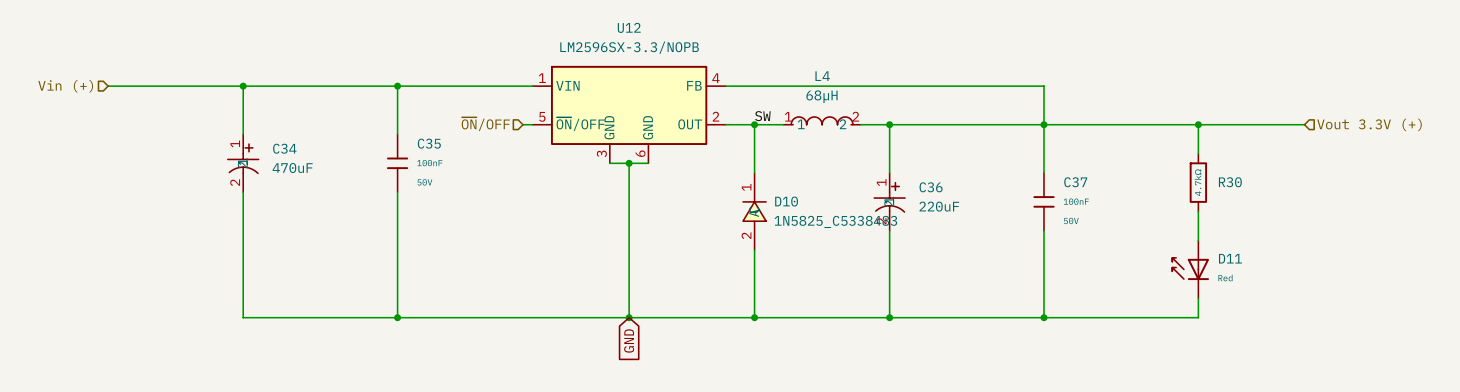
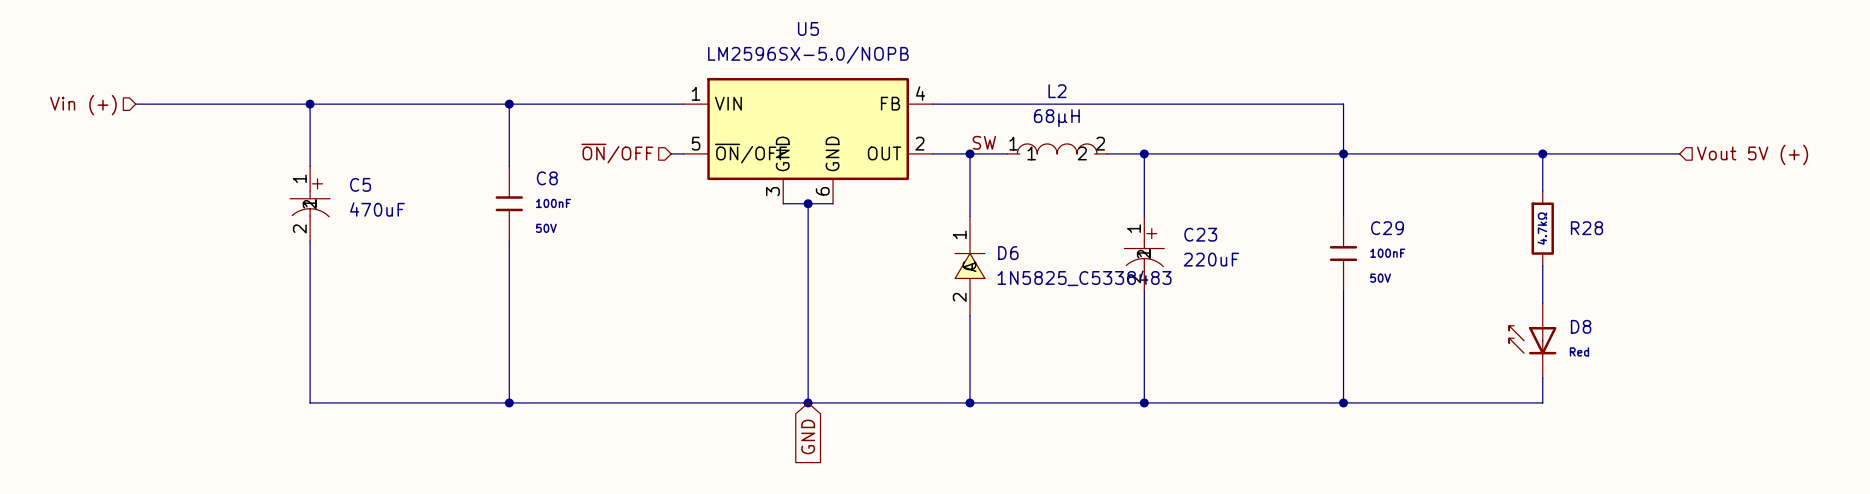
U12 name: U12 (629, 27) -> U5 (808, 28)
U12 value: LM2596SX-3.3/NOPB (629, 47) -> LM2596SX-5.0/NOPB (808, 55)
L4 name: L4 (822, 76) -> L2 (1057, 91)
hierarchical label: Vout 3.3V (+) (1369, 124) -> Vout 5V (+) (1752, 154)
C35 name: C35 (429, 143) -> C8 (547, 178)
C34 name: C34 (284, 148) -> C5 (360, 184)
C37 name: C37 (1075, 182) -> C29 (1387, 228)
R30 name: R30 (1230, 182) -> R28 (1587, 228)
C36 name: C36 (931, 187) -> C23 (1200, 234)
D10 name: D10 (786, 201) -> D6 (1008, 253)
D11 name: D11 (1230, 258) -> D8 (1581, 326)

